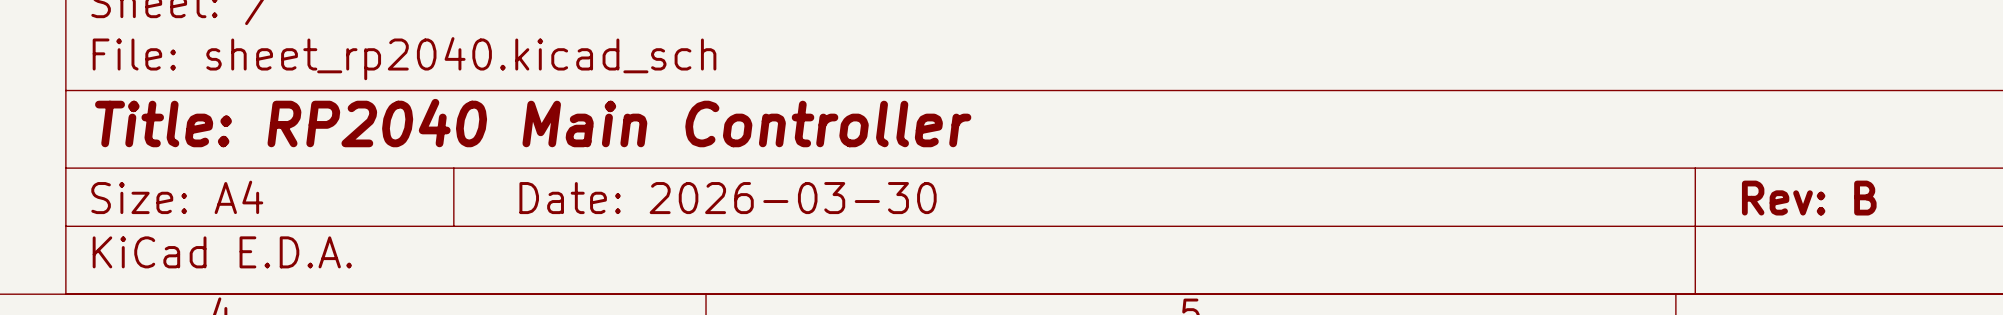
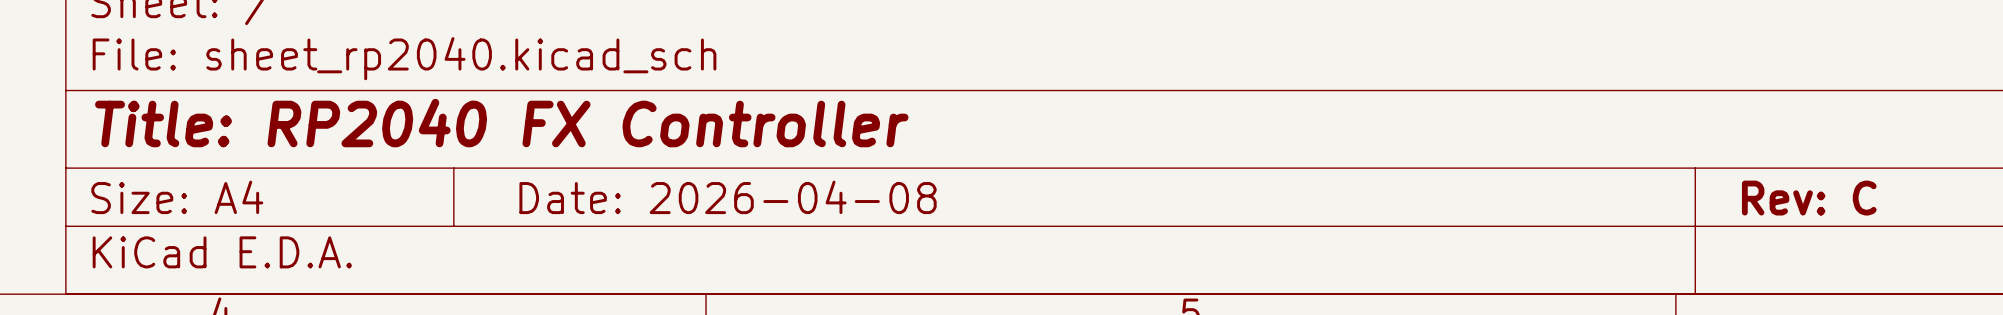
title block: Title: RP2040 Main Controller (533, 123) -> Title: RP2040 FX Controller (501, 123)
title block: Date: 2026-03-30 (728, 198) -> Date: 2026-04-08 (728, 197)
title block: Rev: B (1809, 198) -> Rev: C (1809, 198)

